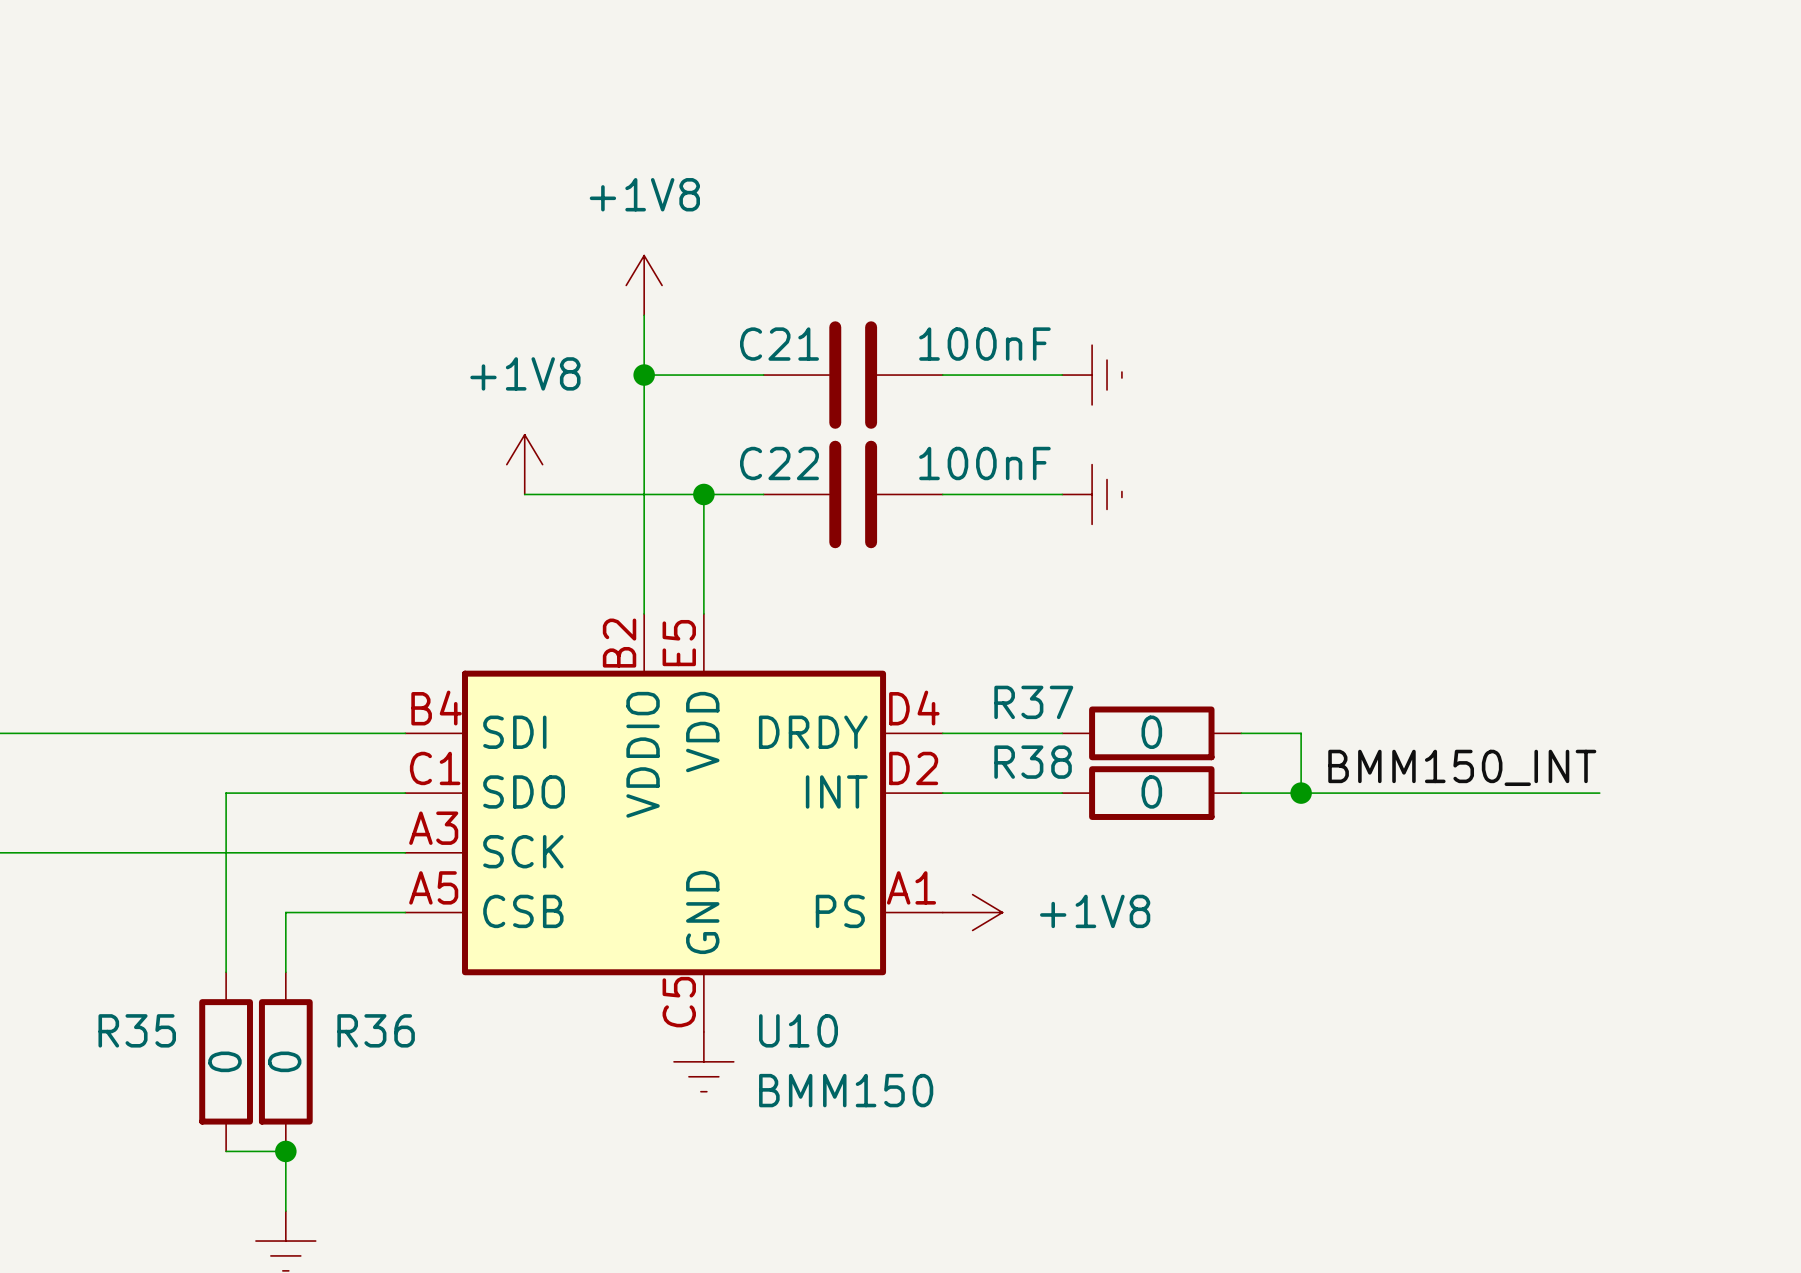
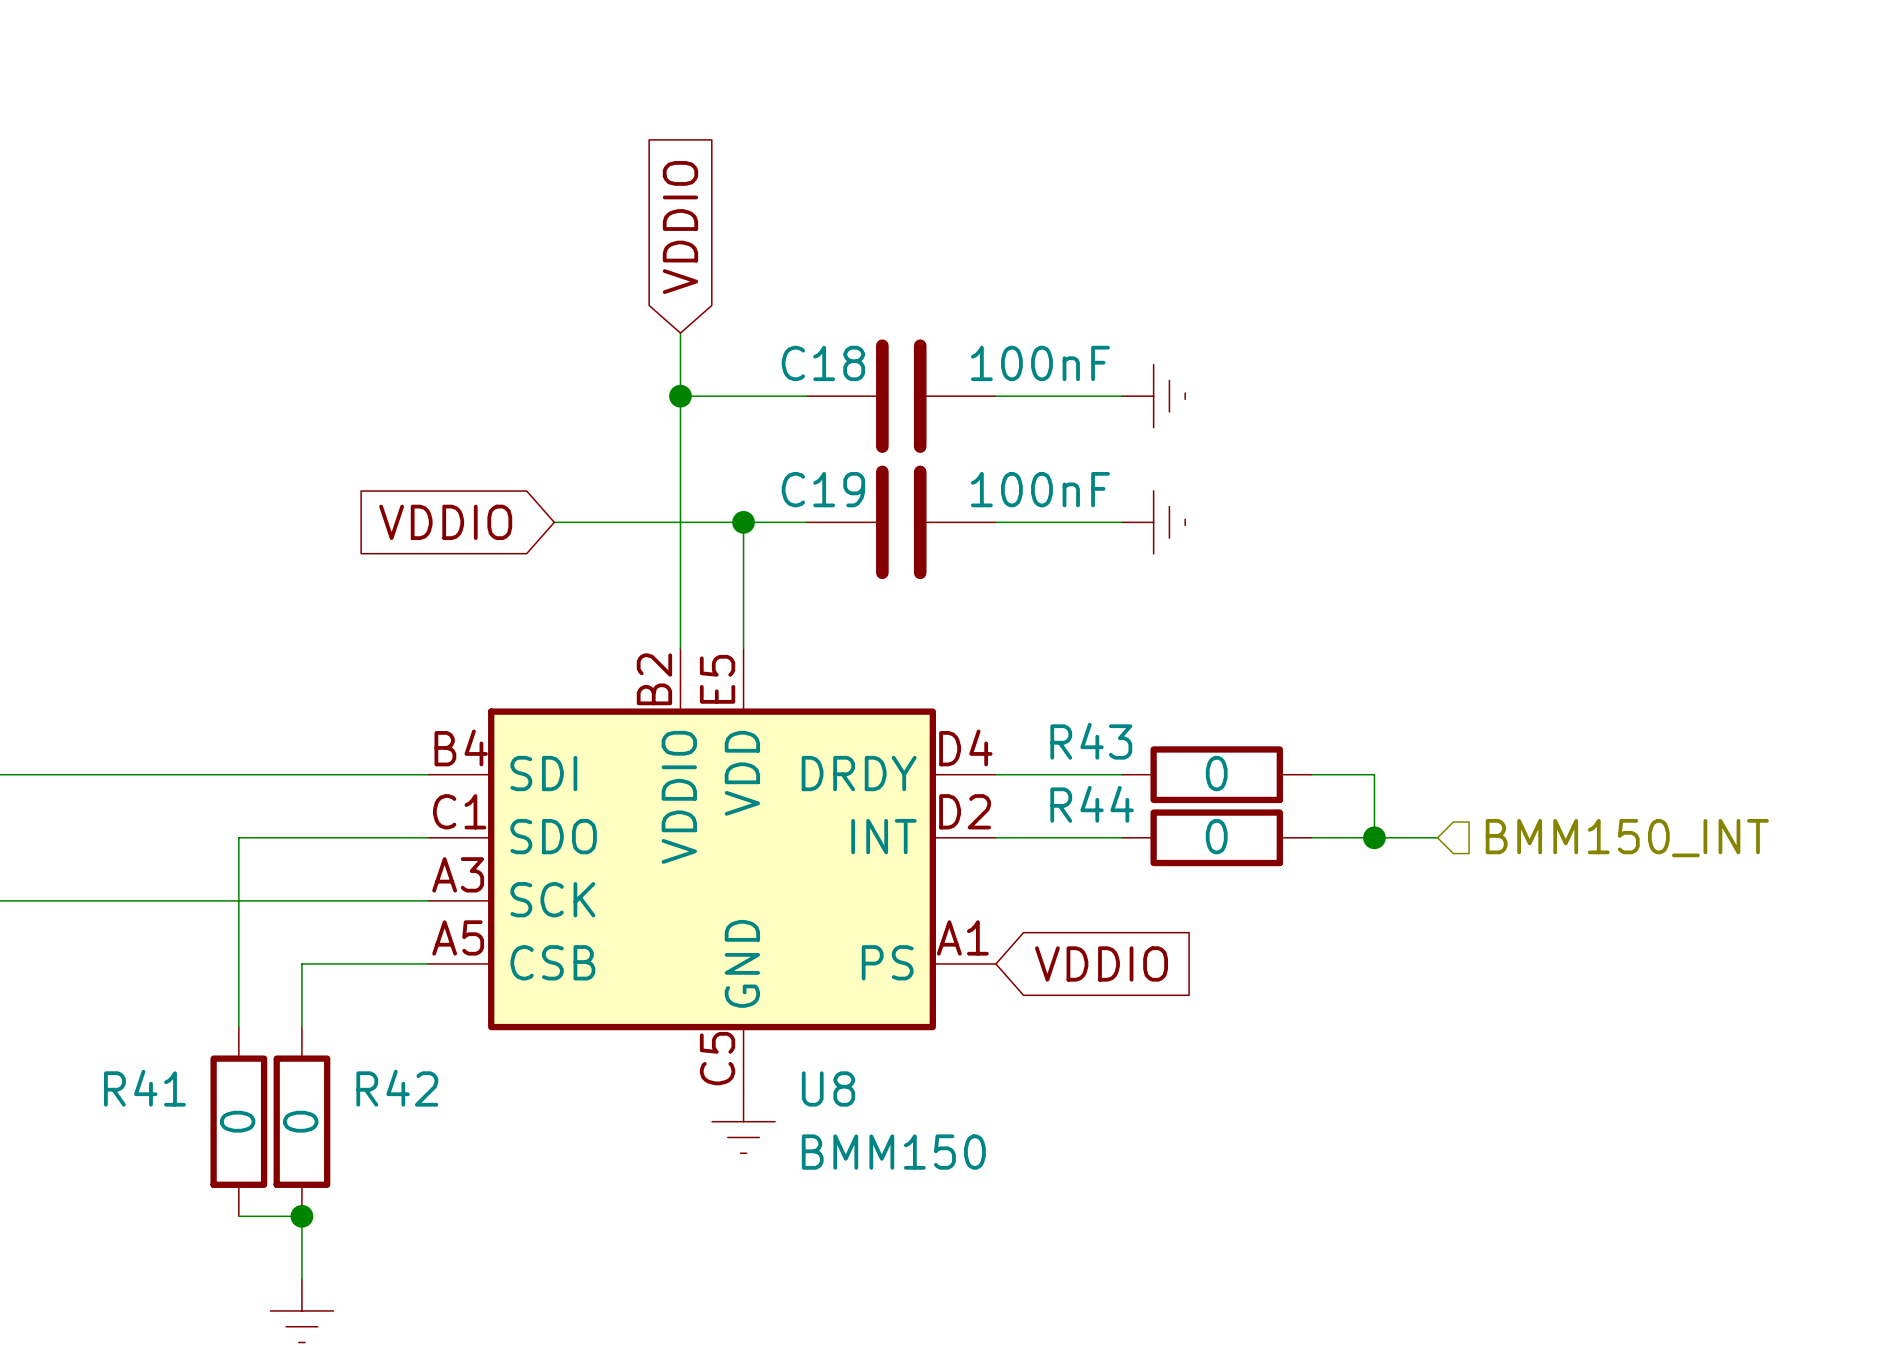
global label: none -> VDDIO (680, 227)
power symbol: +1V8 (644, 285) -> none
C21 name: C21 (779, 344) -> C18 (823, 363)
C22 name: C22 (779, 463) -> C19 (823, 489)
power symbol: +1V8 (524, 464) -> none
global label: none -> VDDIO (445, 522)
R37 name: R37 (1033, 702) -> R43 (1091, 741)
R38 name: R38 (1033, 762) -> R44 (1092, 804)
label: BMM150_INT (1462, 767) -> none
wire: (1360, 793) (1599, 793) -> none
hierarchical label: none -> BMM150_INT (1627, 838)
power symbol: +1V8 (972, 912) -> none
global label: none -> VDDIO (1101, 963)
R35 name: R35 (137, 1030) -> R41 (144, 1088)
R36 name: R36 (376, 1030) -> R42 (397, 1088)
U10 name: U10 (798, 1030) -> U8 (828, 1088)

